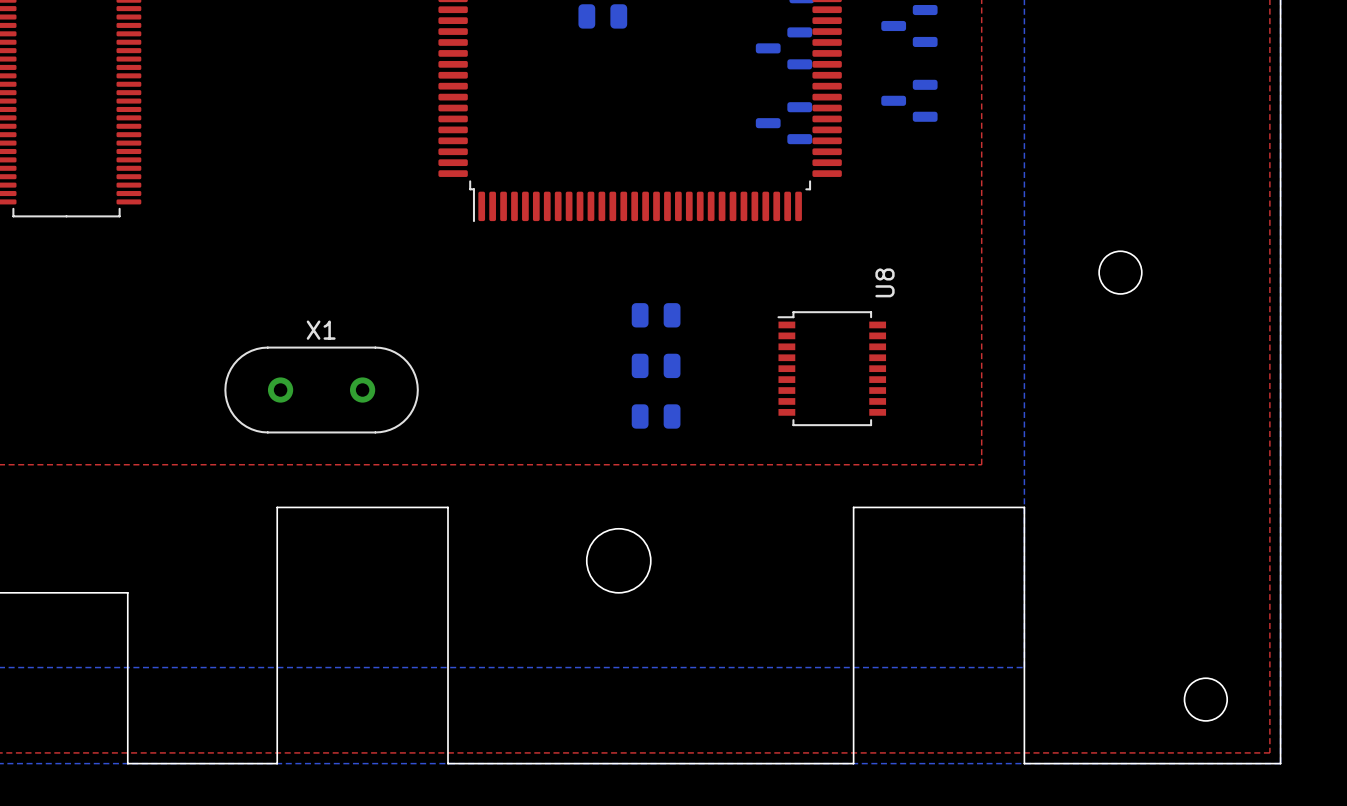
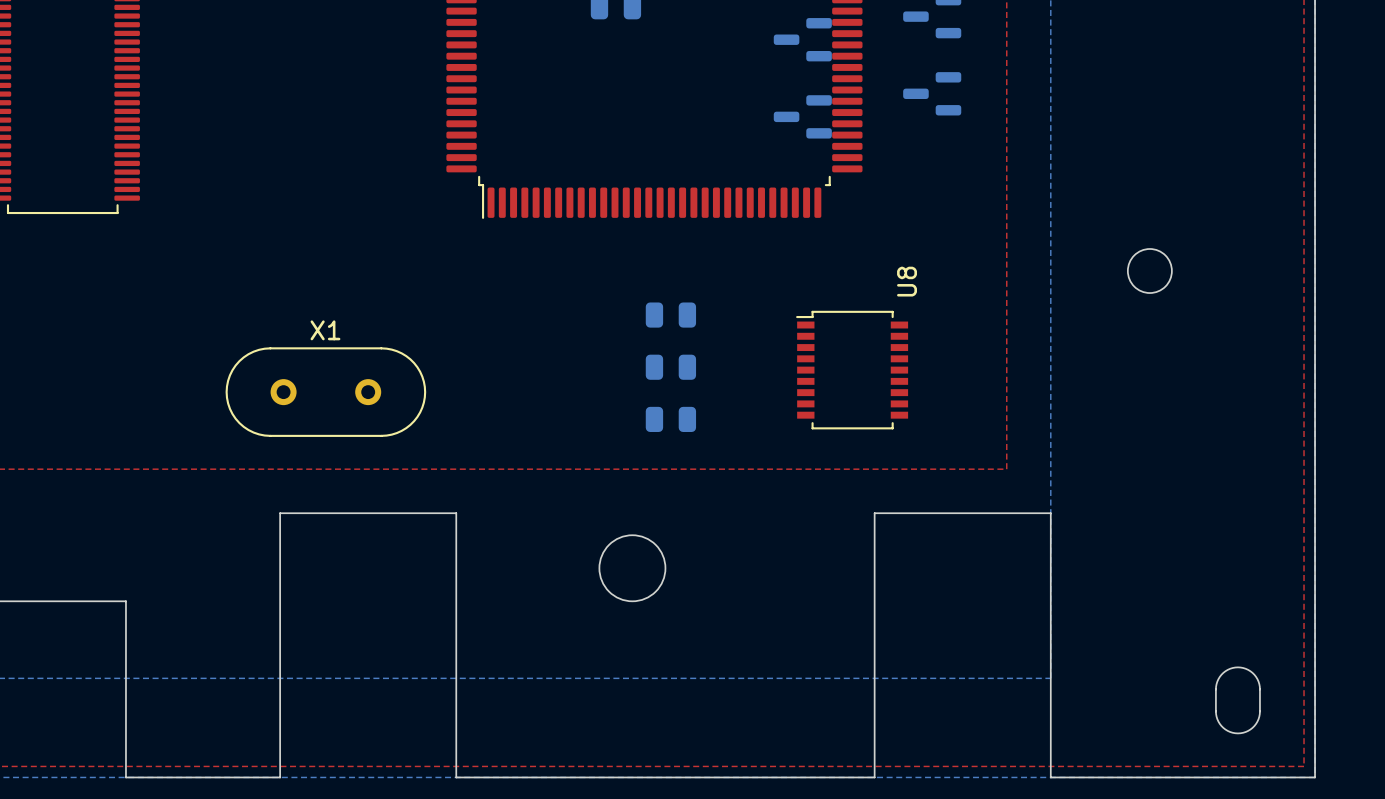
round board edge: [1183, 677, 1229, 722] -> none
board edge: none -> (1215, 689) (1216, 714) (1221, 725) (1227, 730) (1237, 733) (1252, 727) (1257, 721) (1259, 711) (1259, 686) (1254, 674) (1243, 667) (1230, 668) (1219, 676) (1215, 689)

